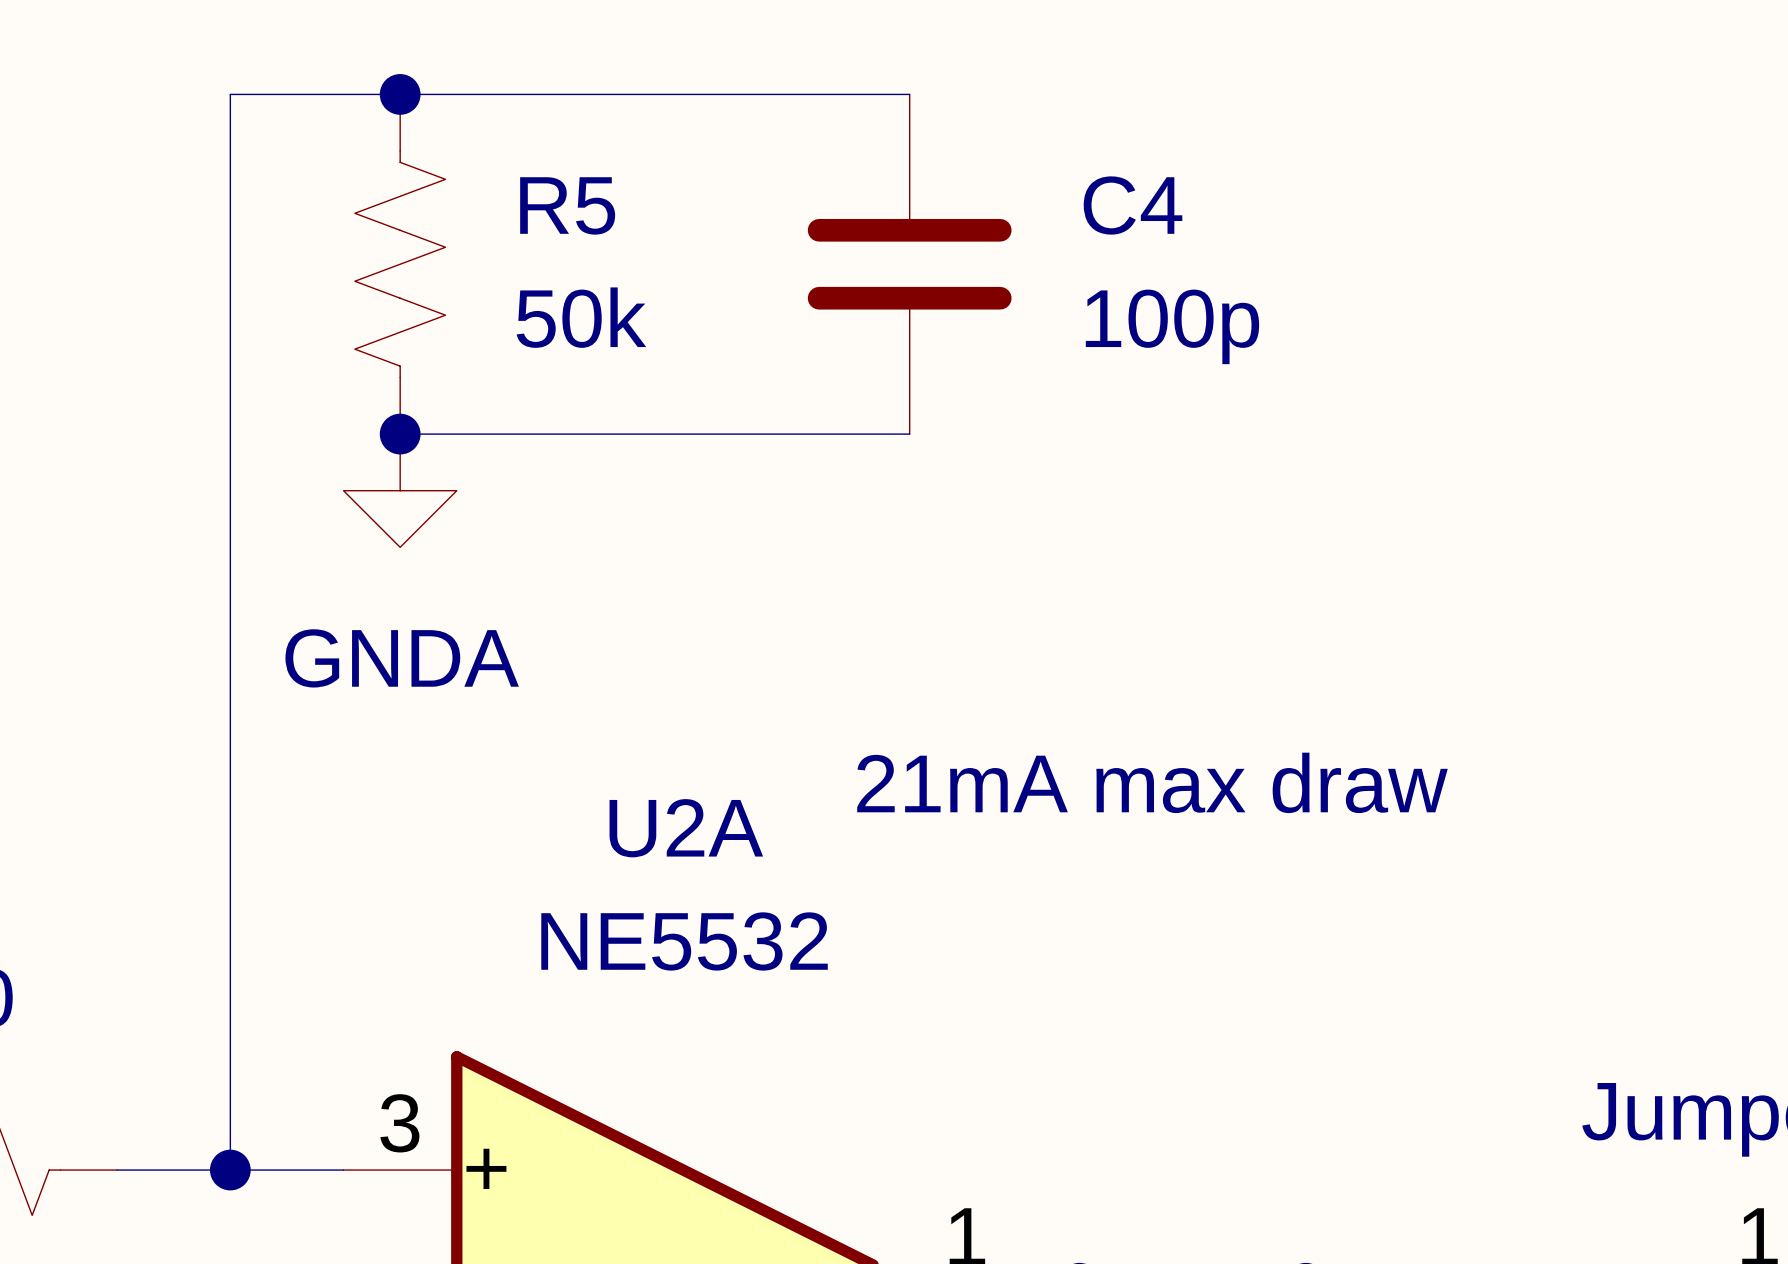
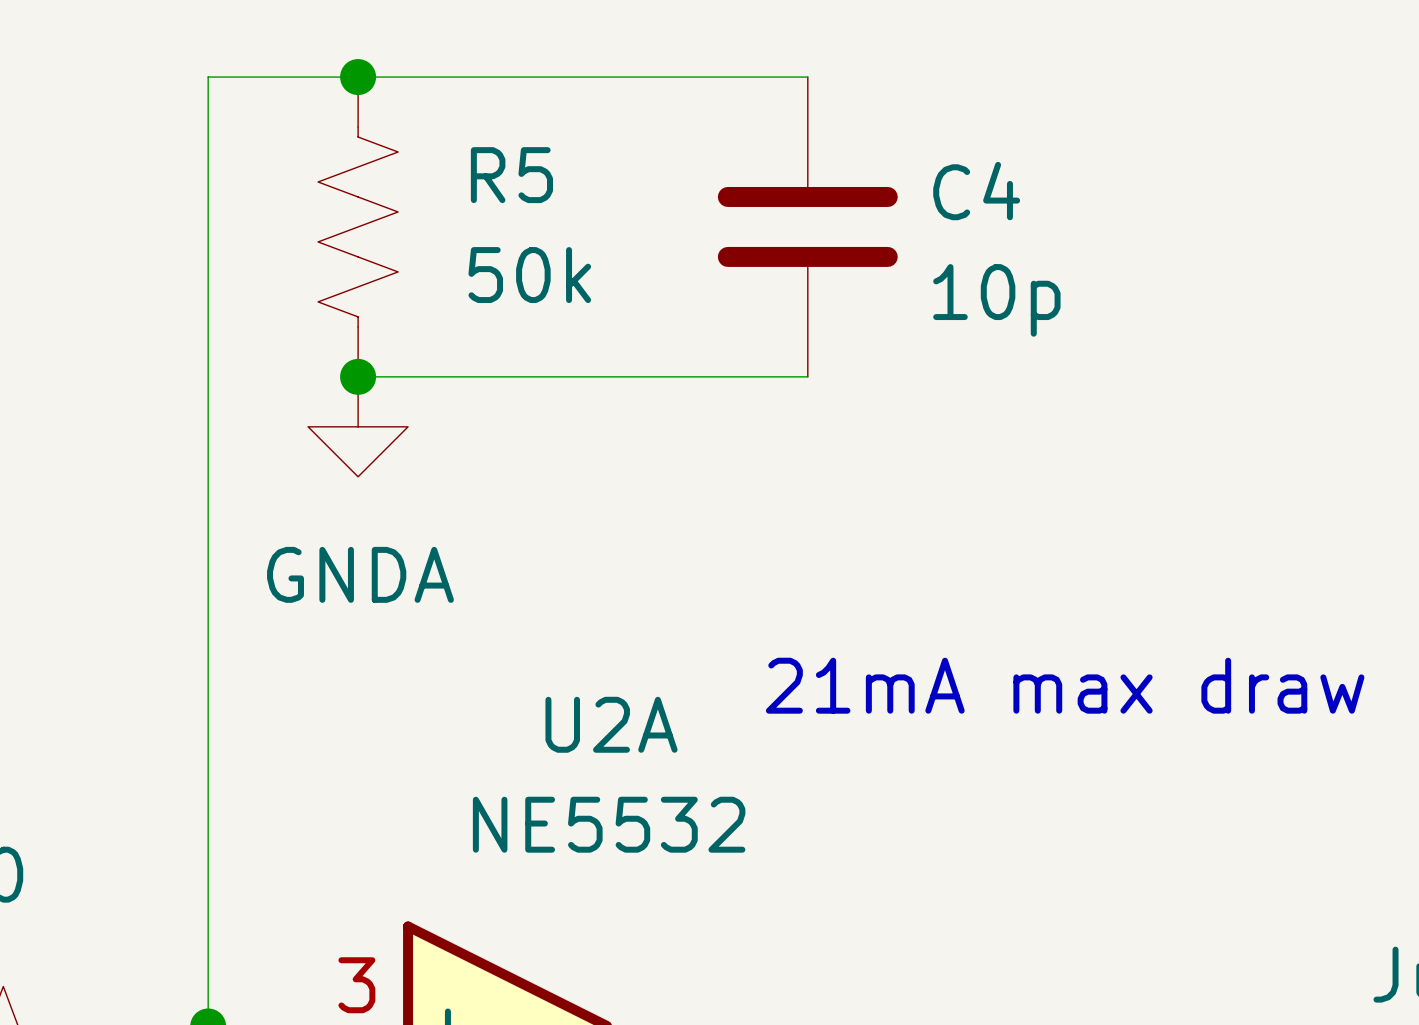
C4 name position: C4 (1132, 205) -> C4 (976, 191)
C4 value: 100p (1172, 326) -> 10p (996, 300)

